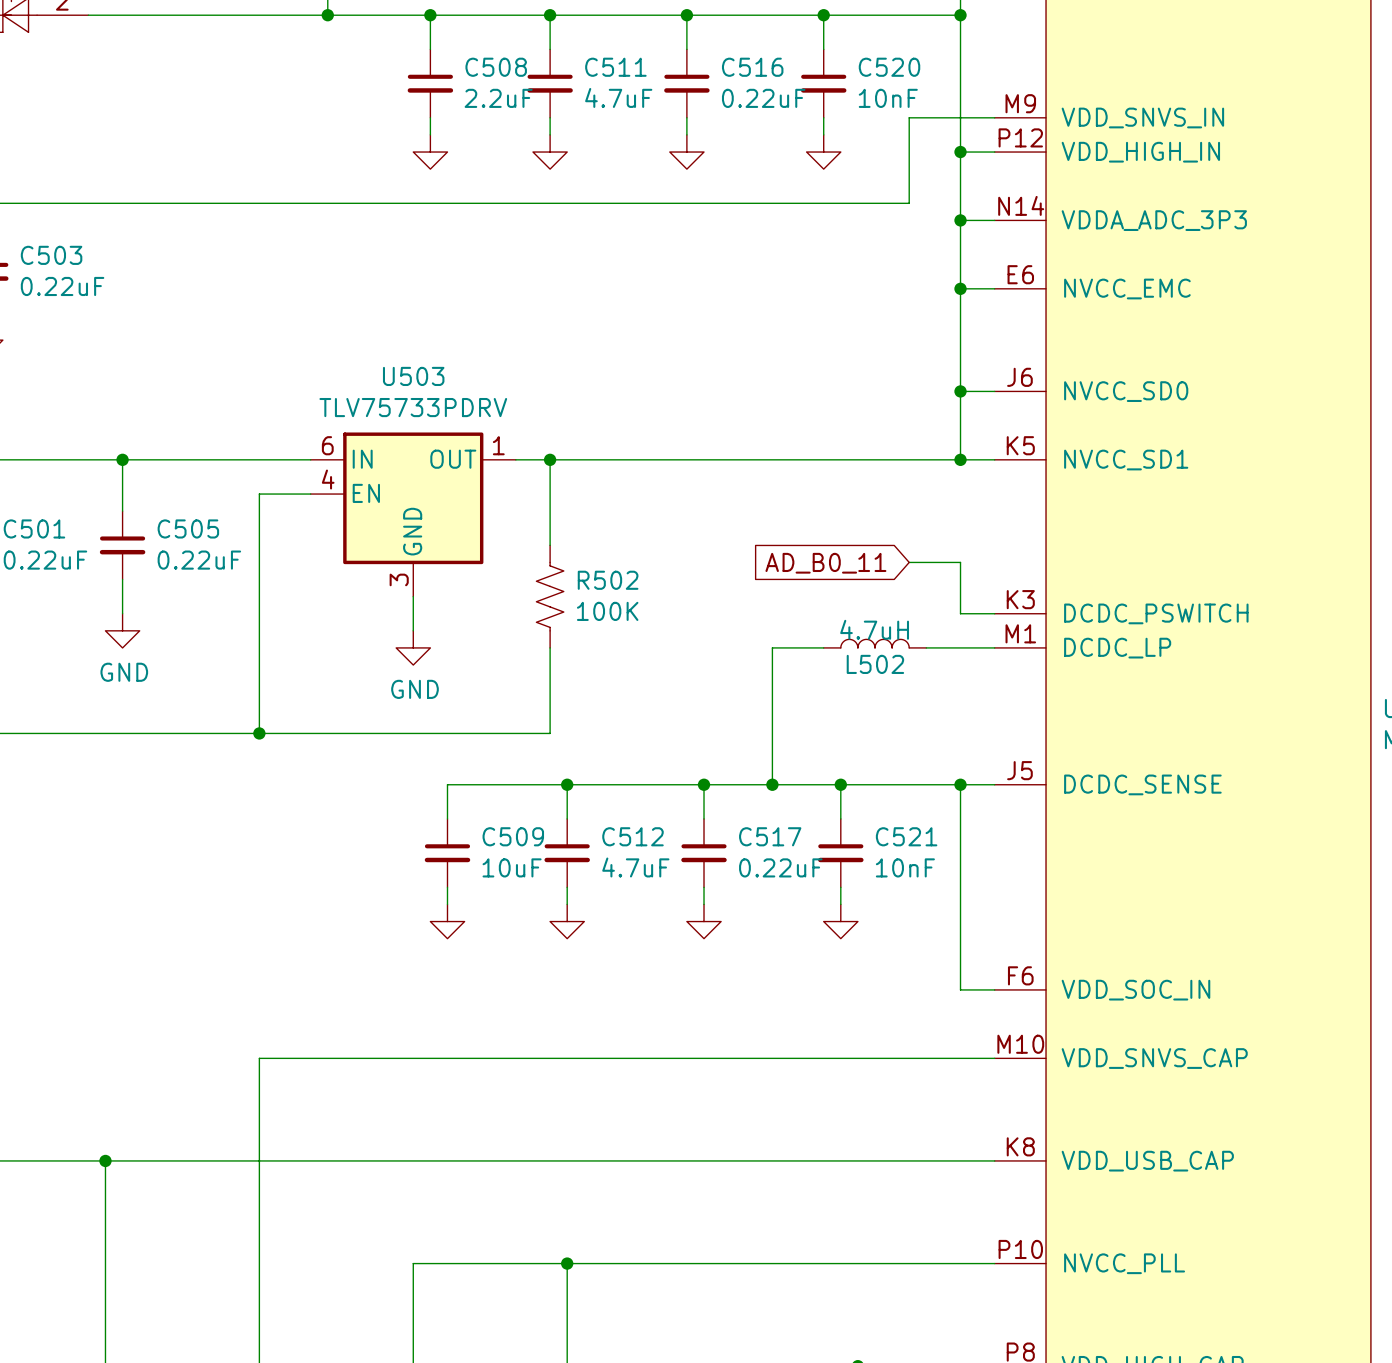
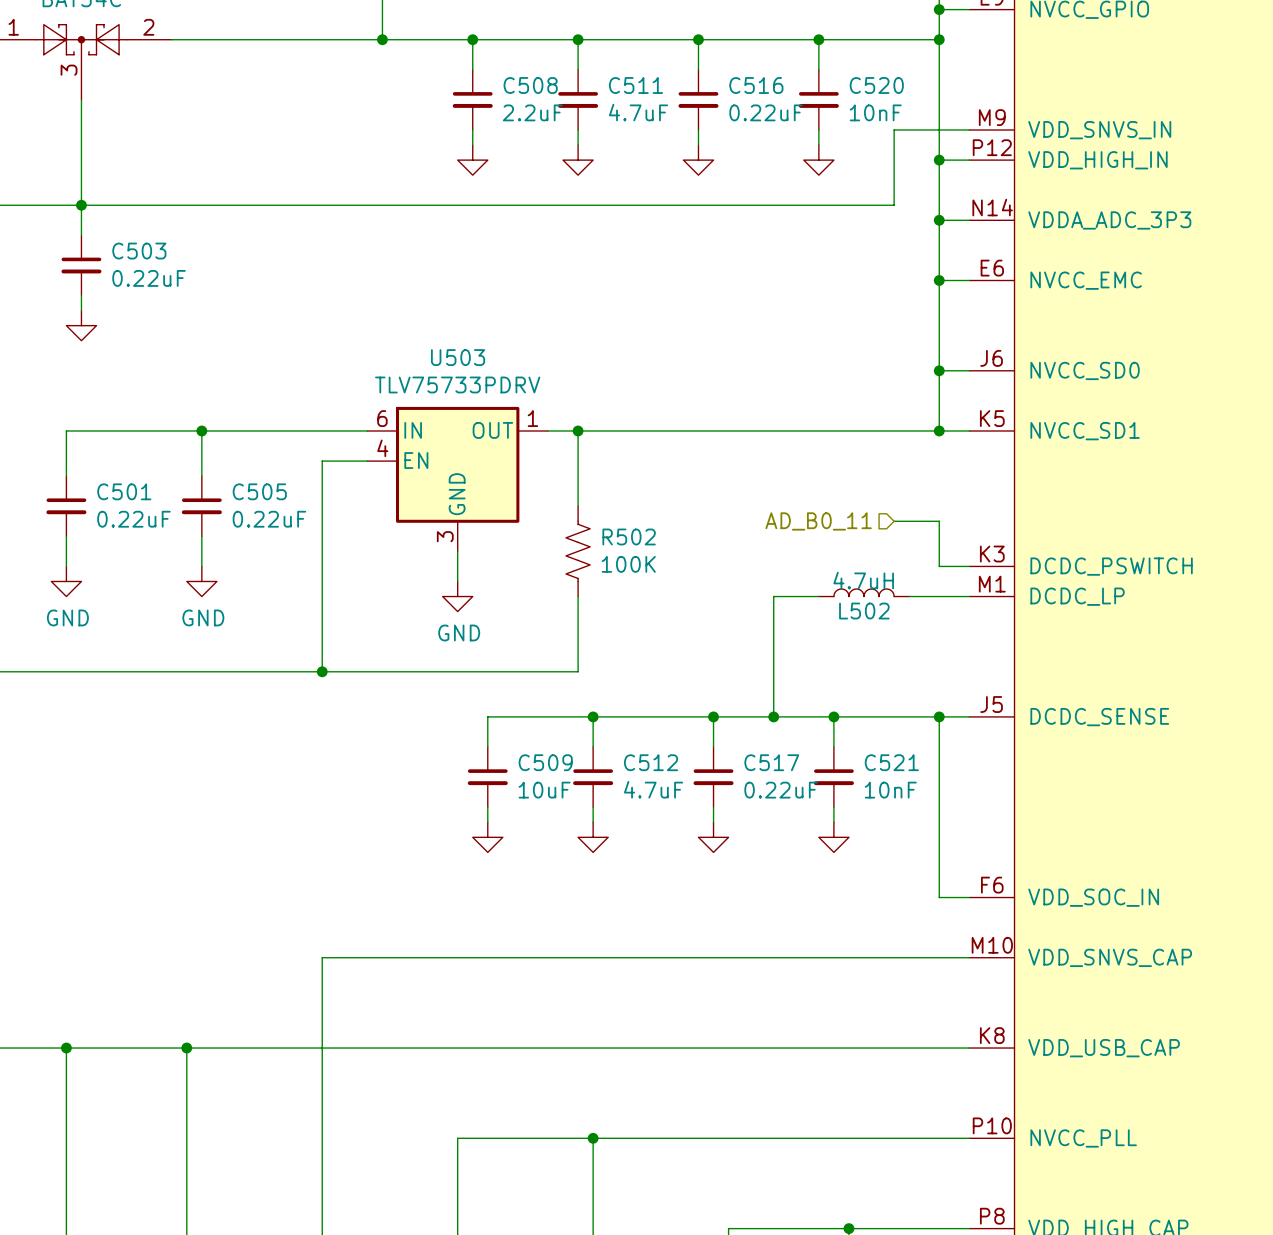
hierarchical label: none -> AD_B0_11 (818, 521)
global label: AD_B0_11 (825, 563) -> none

